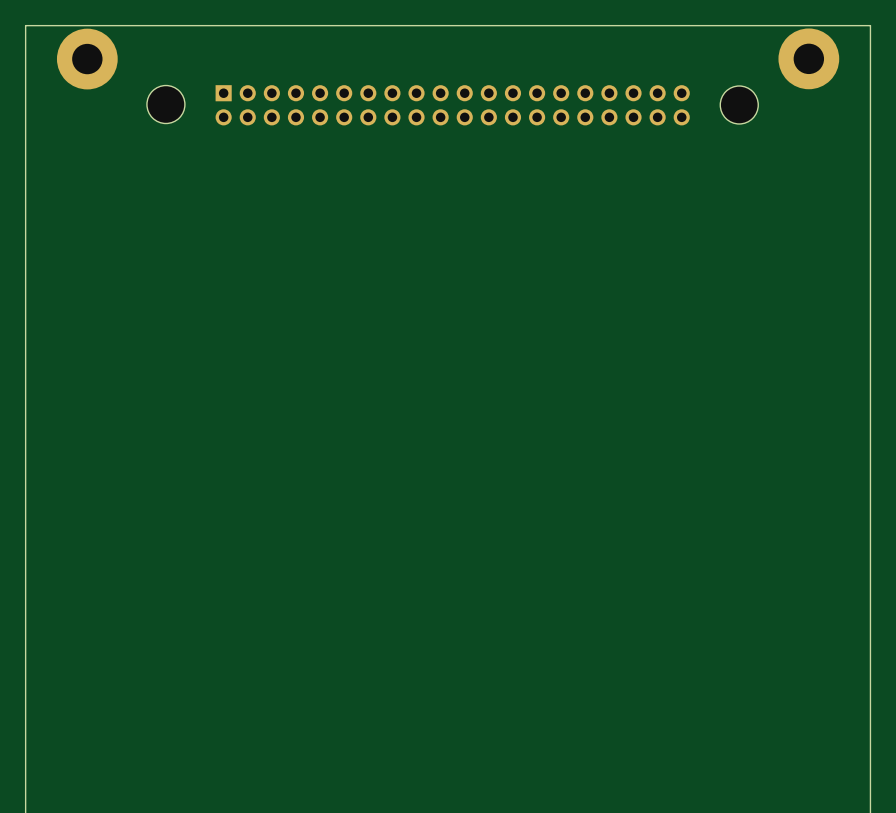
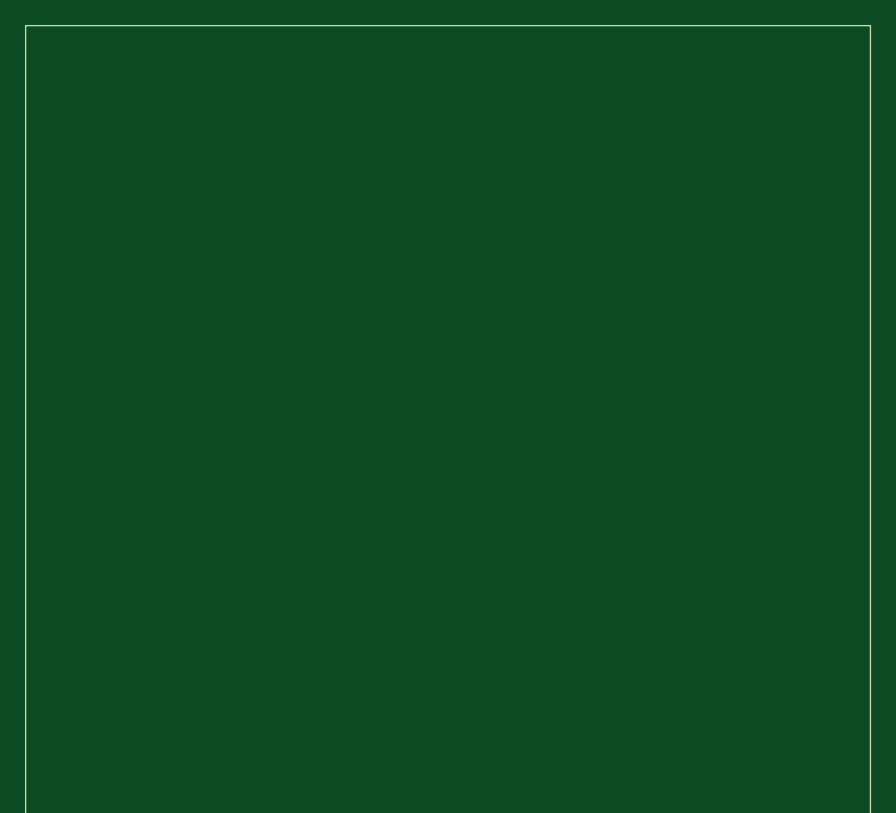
part: (808, 58) -> none
part: (87, 59) -> none
part: (165, 104) -> none
part: (739, 104) -> none
part: (452, 105) -> none

